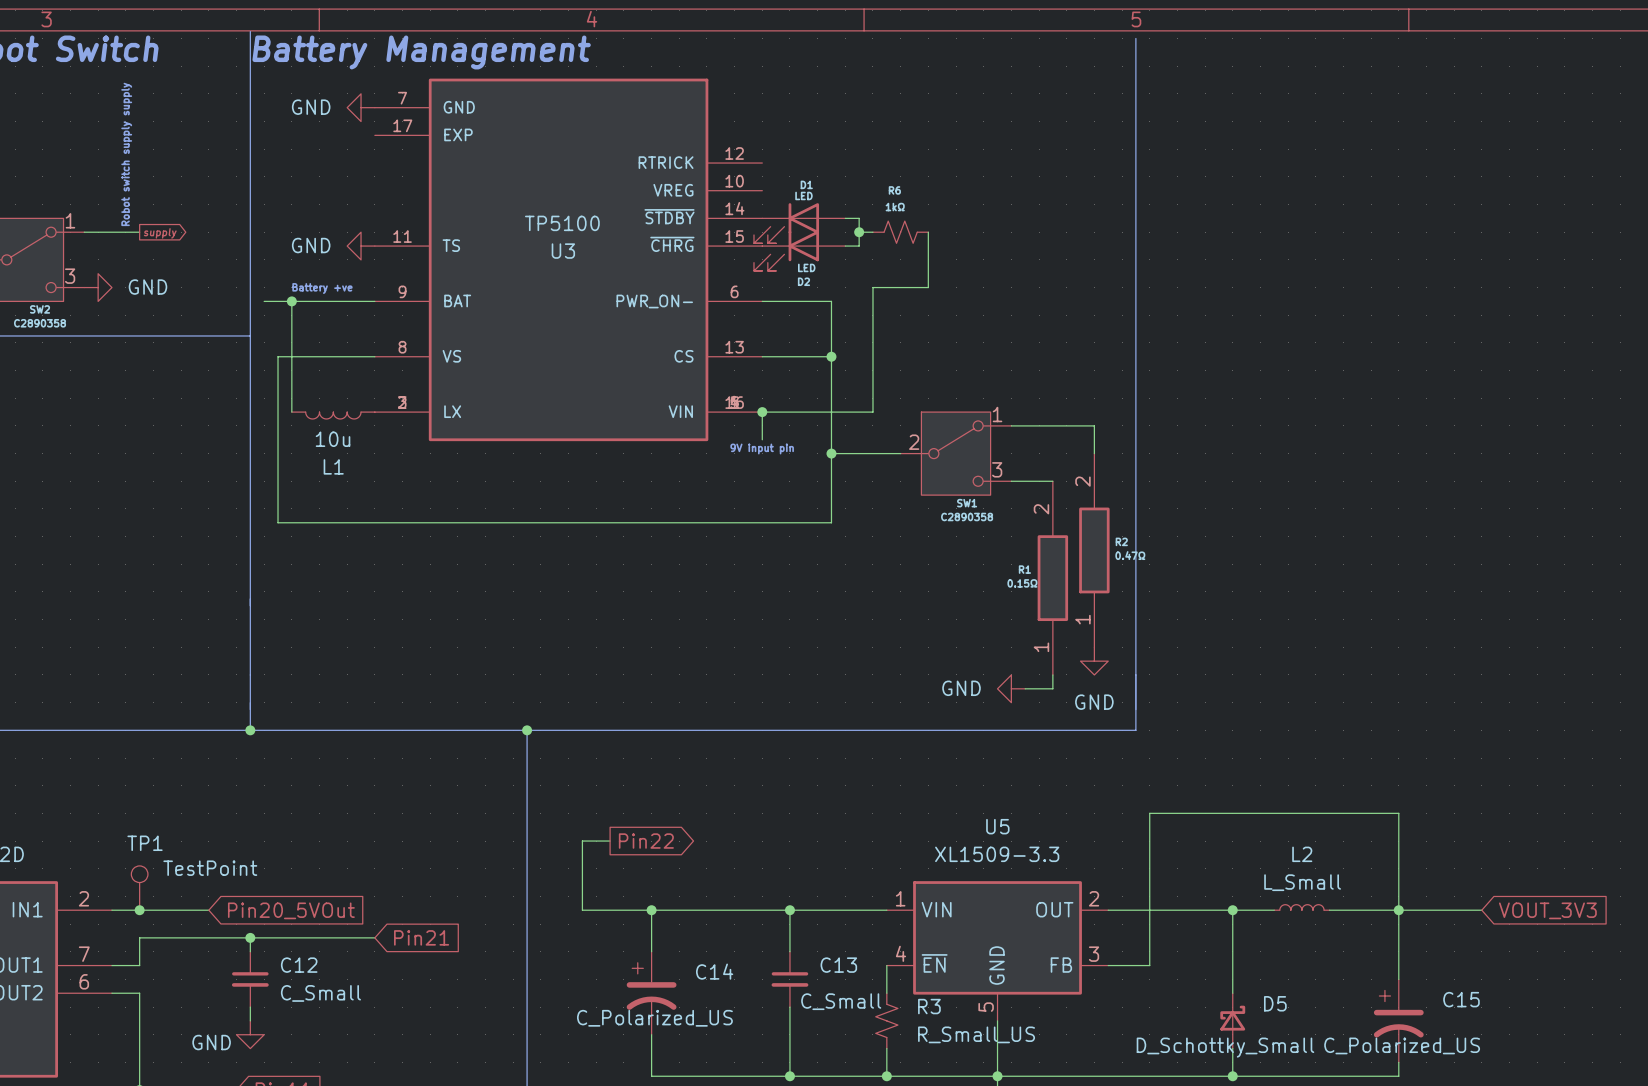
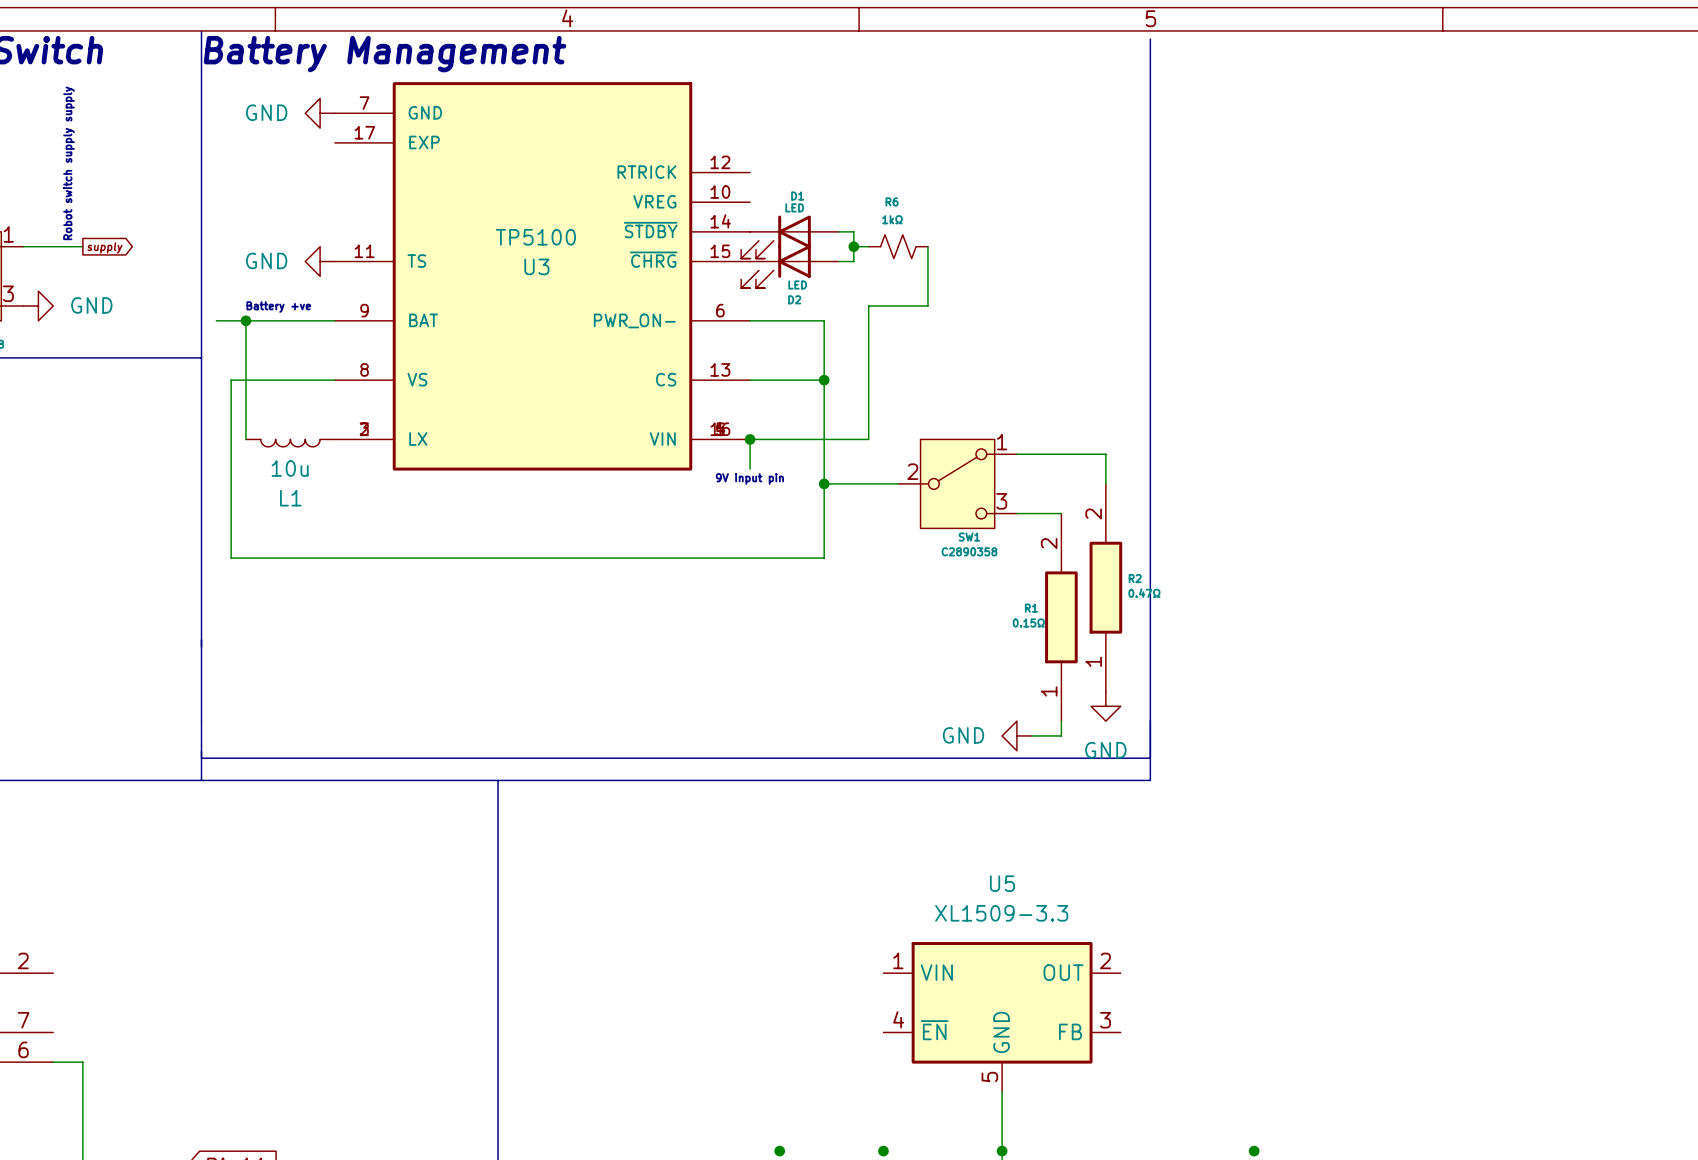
line: none -> (201, 758) (1150, 758)
junction: (250, 730) -> none
junction: (527, 730) -> none
wire: (610, 841) (582, 841) (582, 910) (886, 910) -> none
global label: Pin22 (646, 841) -> none
TP1: TestPoint (139, 888) -> none
L2: L_Small (1301, 907) -> none
wire: (111, 910) (208, 910) -> none
junction: (139, 910) -> none
global label: Pin20_5VOut (291, 910) -> none
wire: (651, 910) (651, 951) -> none
junction: (651, 910) -> none
wire: (789, 910) (789, 951) -> none
junction: (789, 910) -> none
wire: (1108, 910) (1274, 910) -> none
wire: (1232, 910) (1232, 993) -> none
junction: (1232, 910) -> none
wire: (1329, 910) (1481, 910) -> none
junction: (1398, 910) -> none
global label: VOUT_3V3 (1547, 910) -> none
wire: (250, 937) (250, 951) -> none
junction: (250, 937) -> none
wire: (374, 937) (139, 937) (139, 965) (111, 965) -> none
global label: Pin21 (421, 937) -> none
wire: (886, 965) (886, 993) -> none
wire: (1108, 965) (1149, 965) (1149, 813) (1398, 813) (1398, 979) -> none
C12: C_Small (250, 979) -> none
C13: C_Small (789, 979) -> none
C14: C_Polarized_US (651, 993) -> none
wire: (250, 1007) (250, 1020) -> none
wire: (789, 1007) (789, 1076) -> none
R3: R_Small_US (886, 1020) -> none
D5: D_Schottky_Small (1232, 1020) -> none
C15: C_Polarized_US (1398, 1020) -> none
power symbol: GND (250, 1034) -> none
wire: (651, 1034) (651, 1076) (1398, 1076) (1398, 1062) -> none
wire: (886, 1048) (886, 1076) -> none
wire: (1232, 1048) (1232, 1076) -> none

